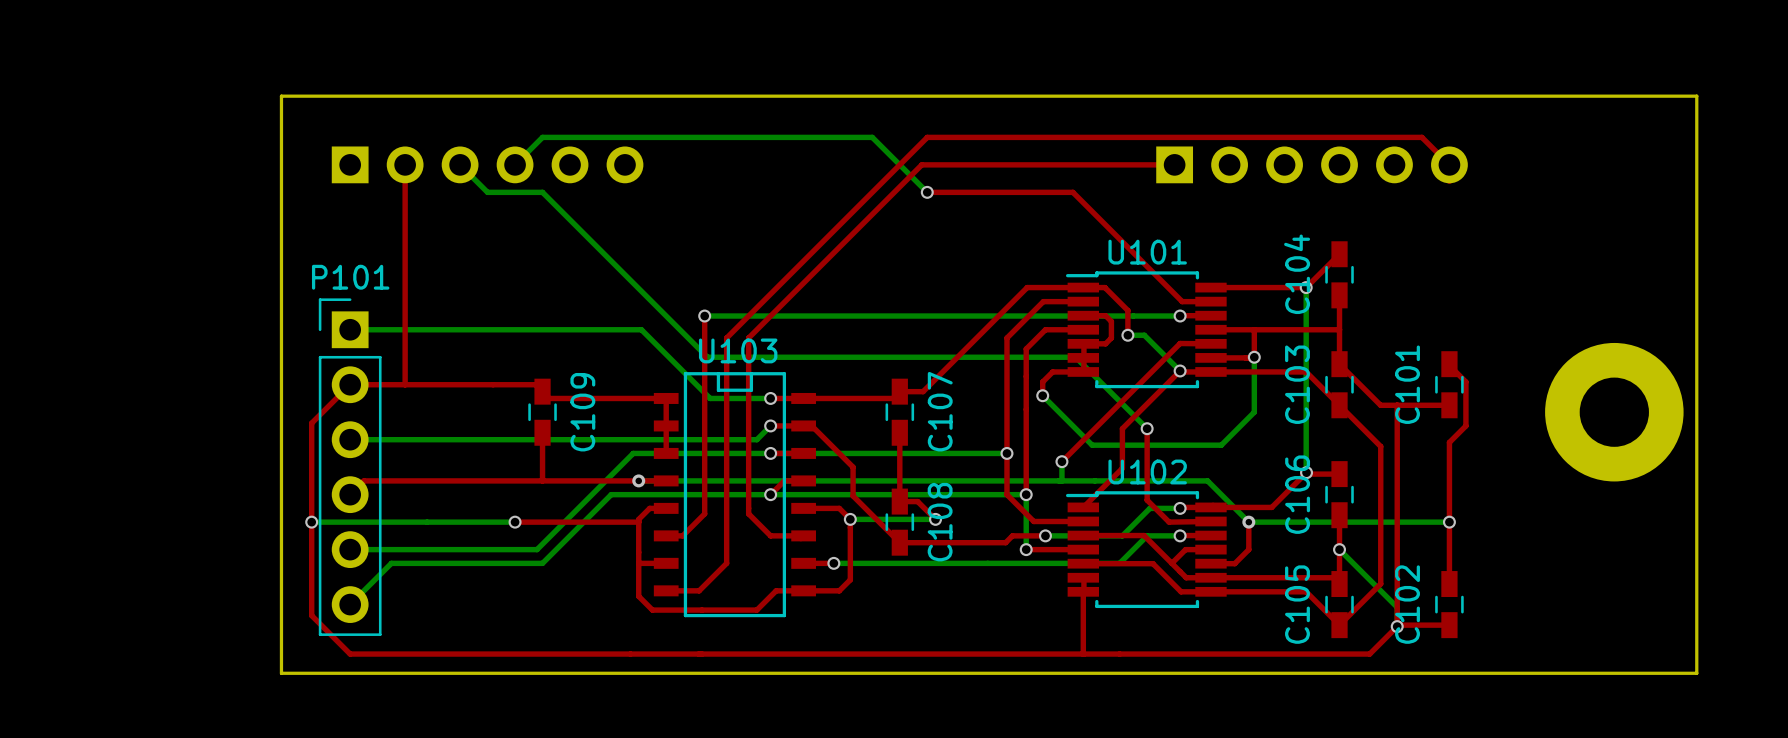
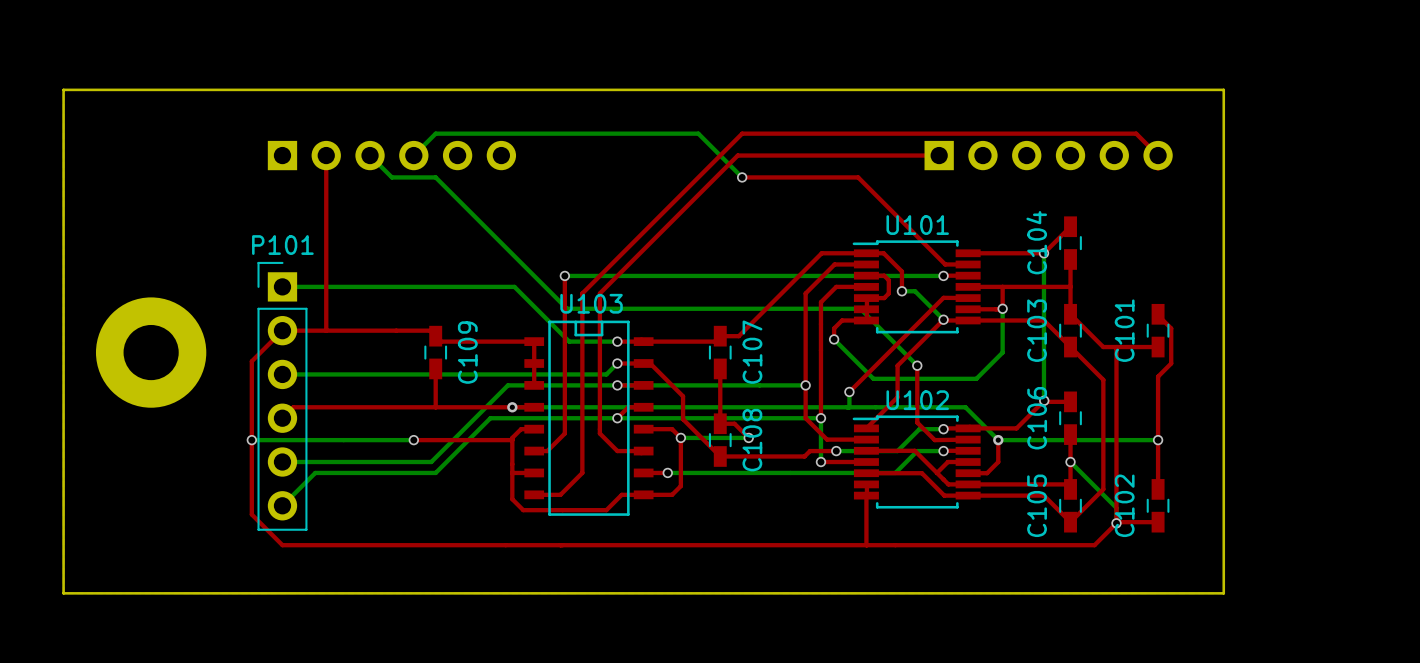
board edge: (281, 96) (281, 673) (1696, 673) (1696, 96) (281, 96) -> (63, 89) (63, 593) (1223, 593) (1223, 89) (63, 89)
part: none -> (151, 352)
part: (1614, 412) -> none

